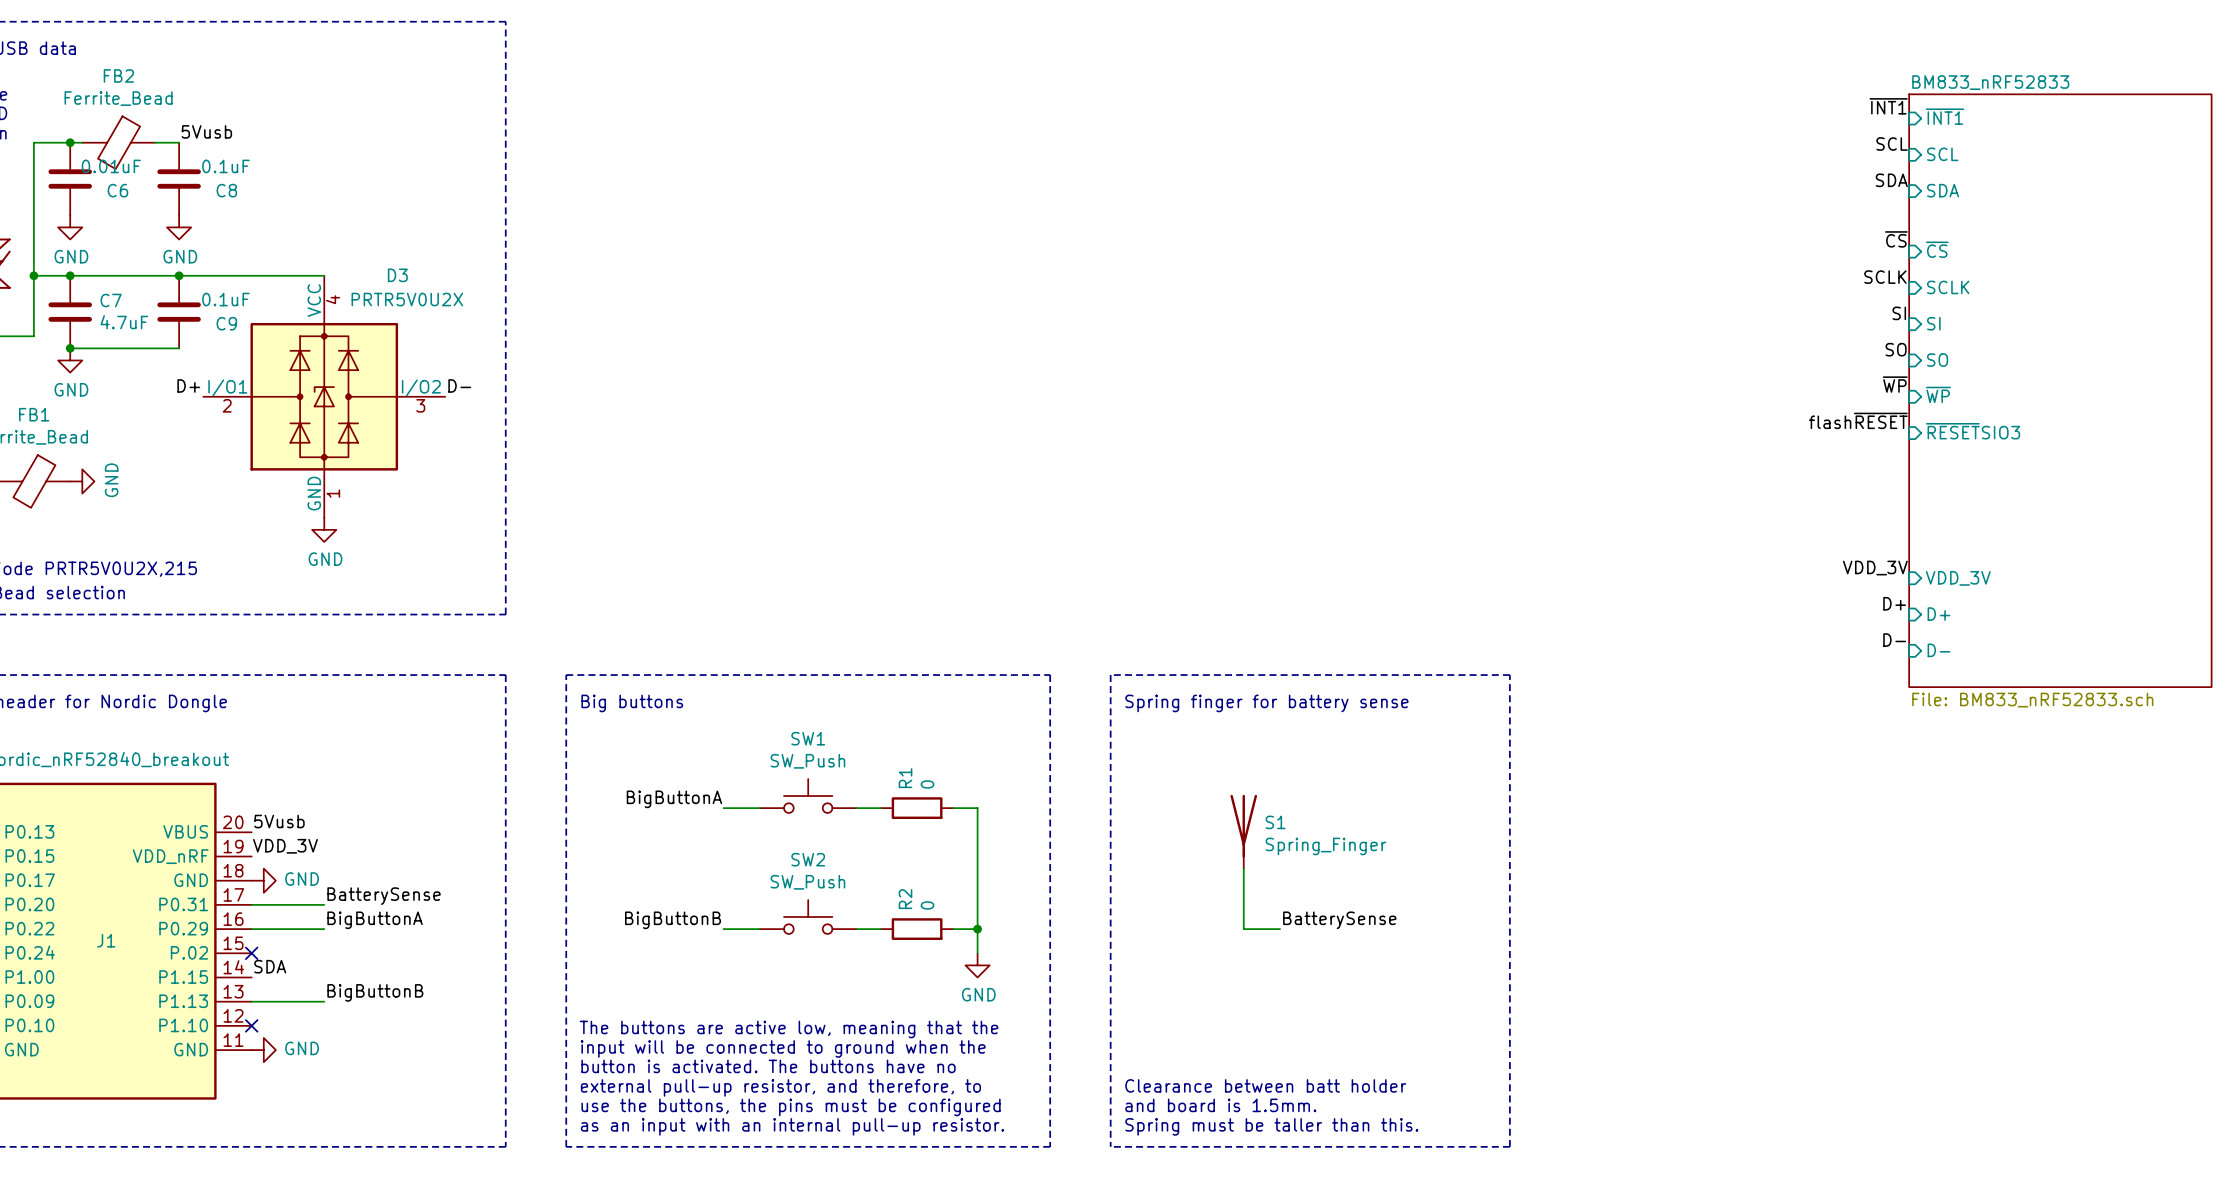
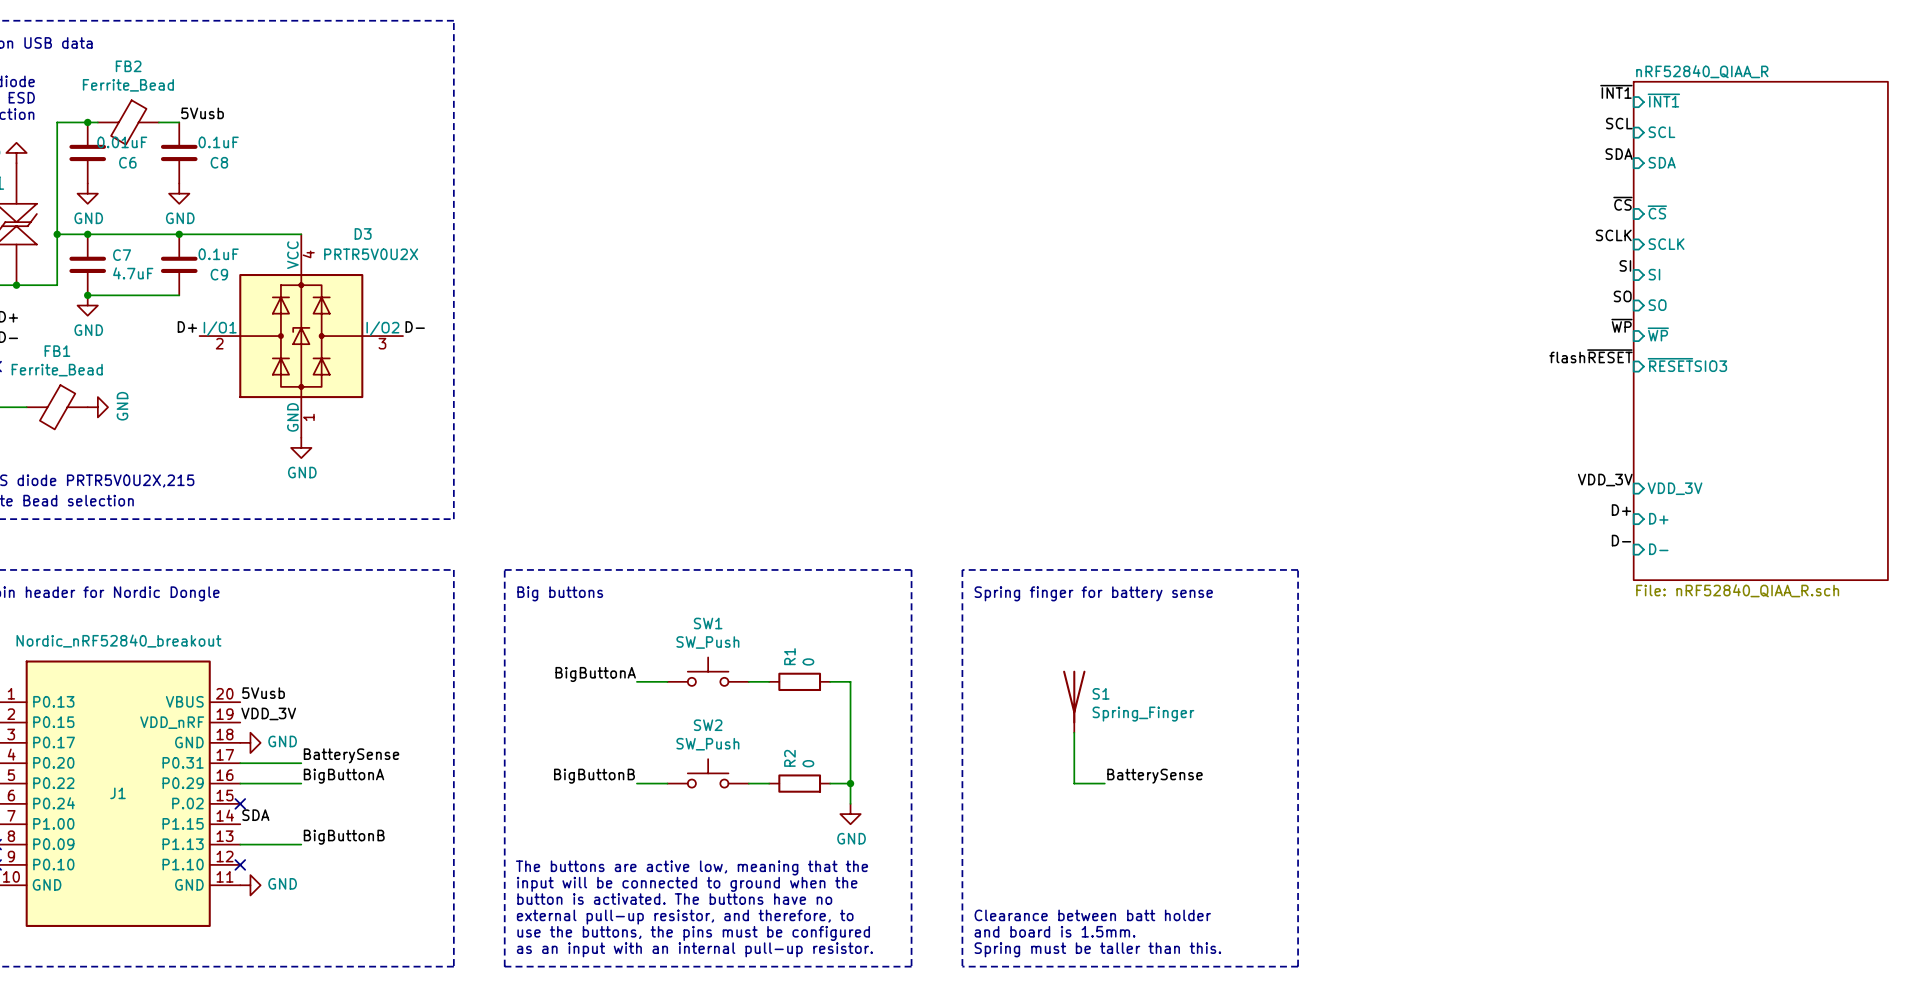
sheet BM833_nRF52833 name: BM833_nRF52833 (1990, 82) -> nRF52840_QIAA_R (1702, 71)
sheet BM833_nRF52833 value: File: BM833_nRF52833.sch (2032, 700) -> File: nRF52840_QIAA_R.sch (1737, 590)

